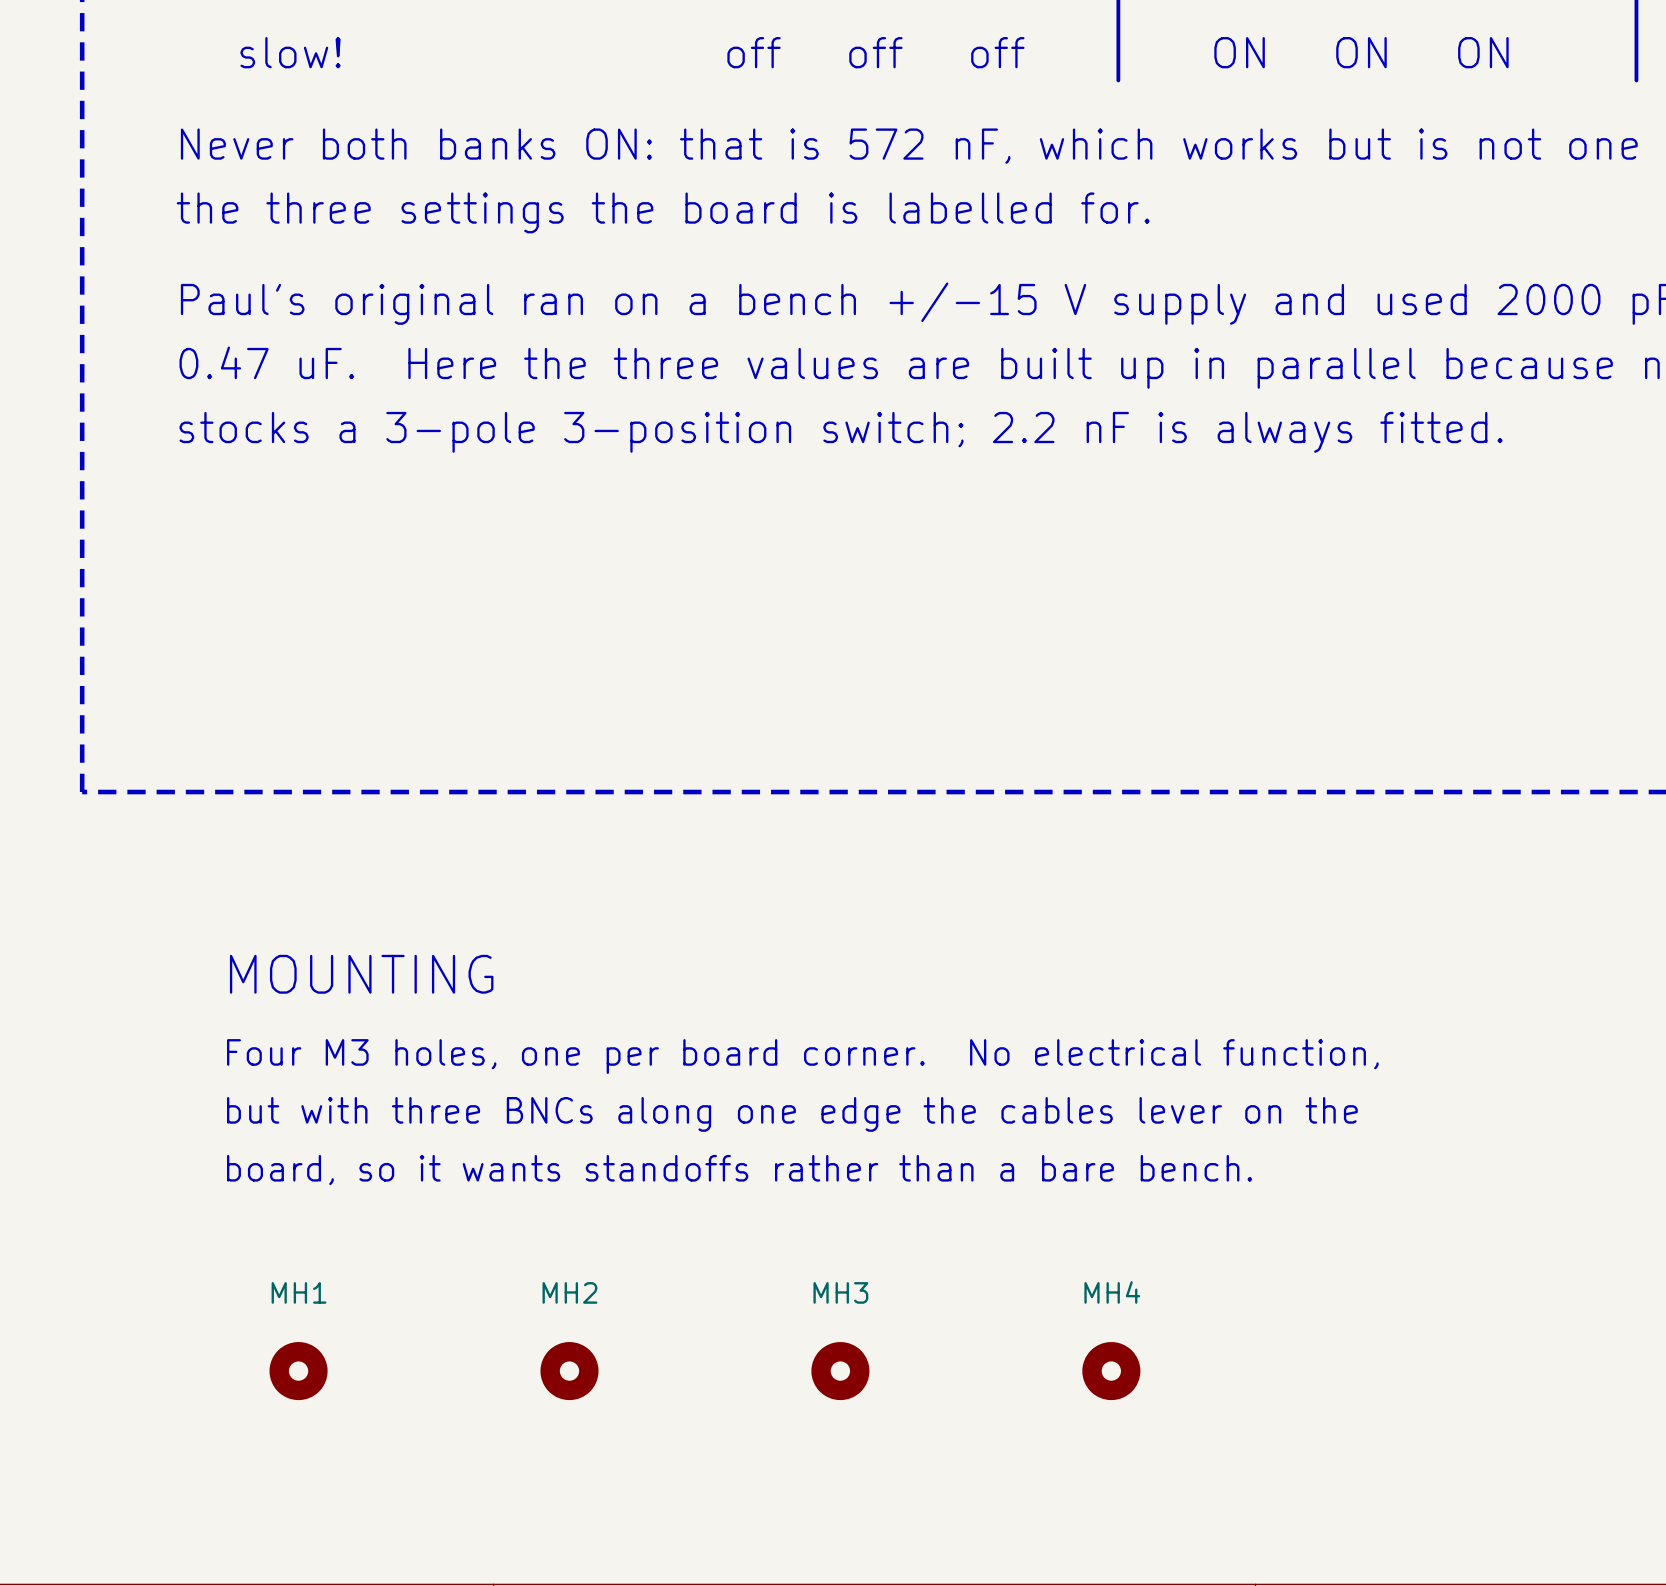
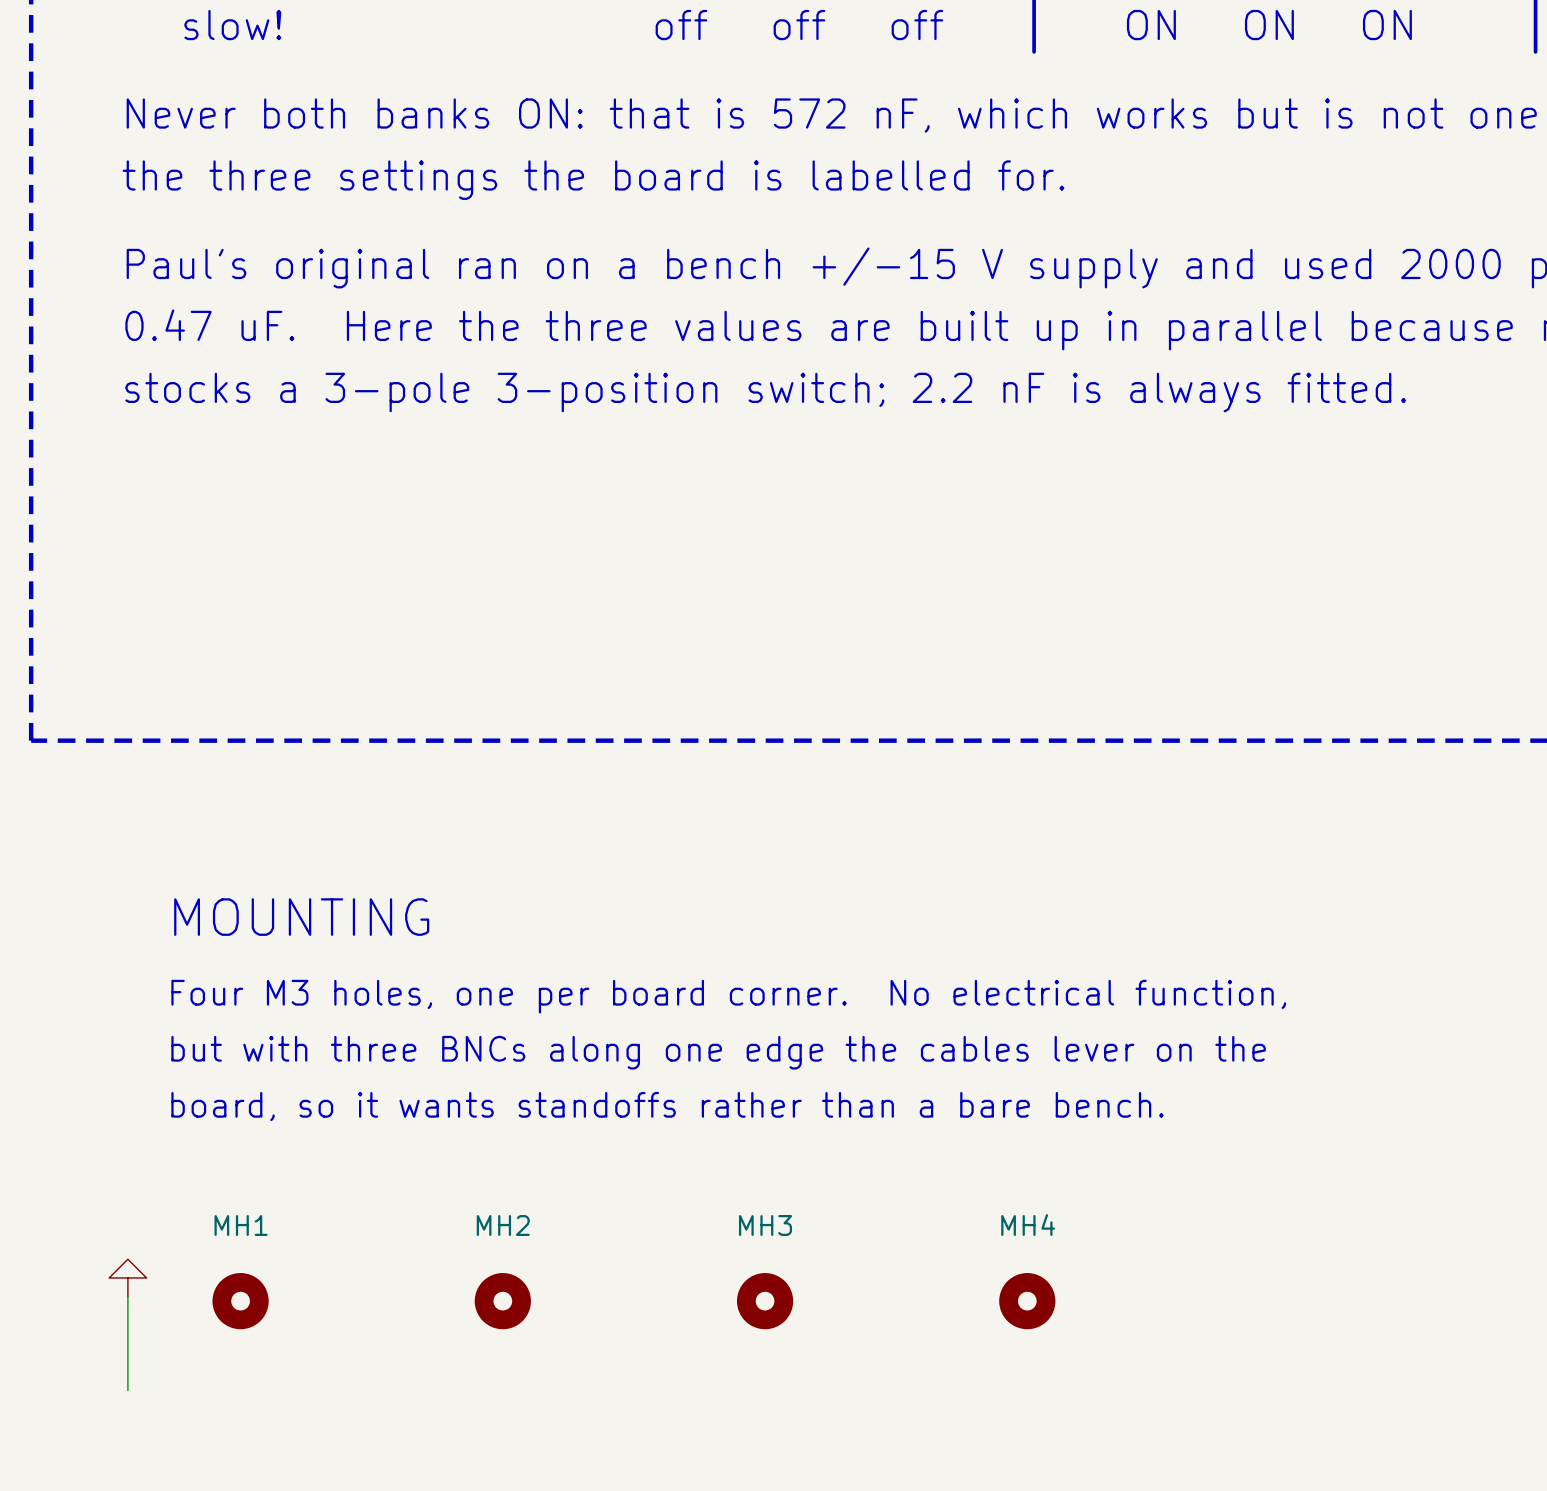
power symbol: none -> (127, 1277)
wire: none -> (127, 1296) (127, 1390)

